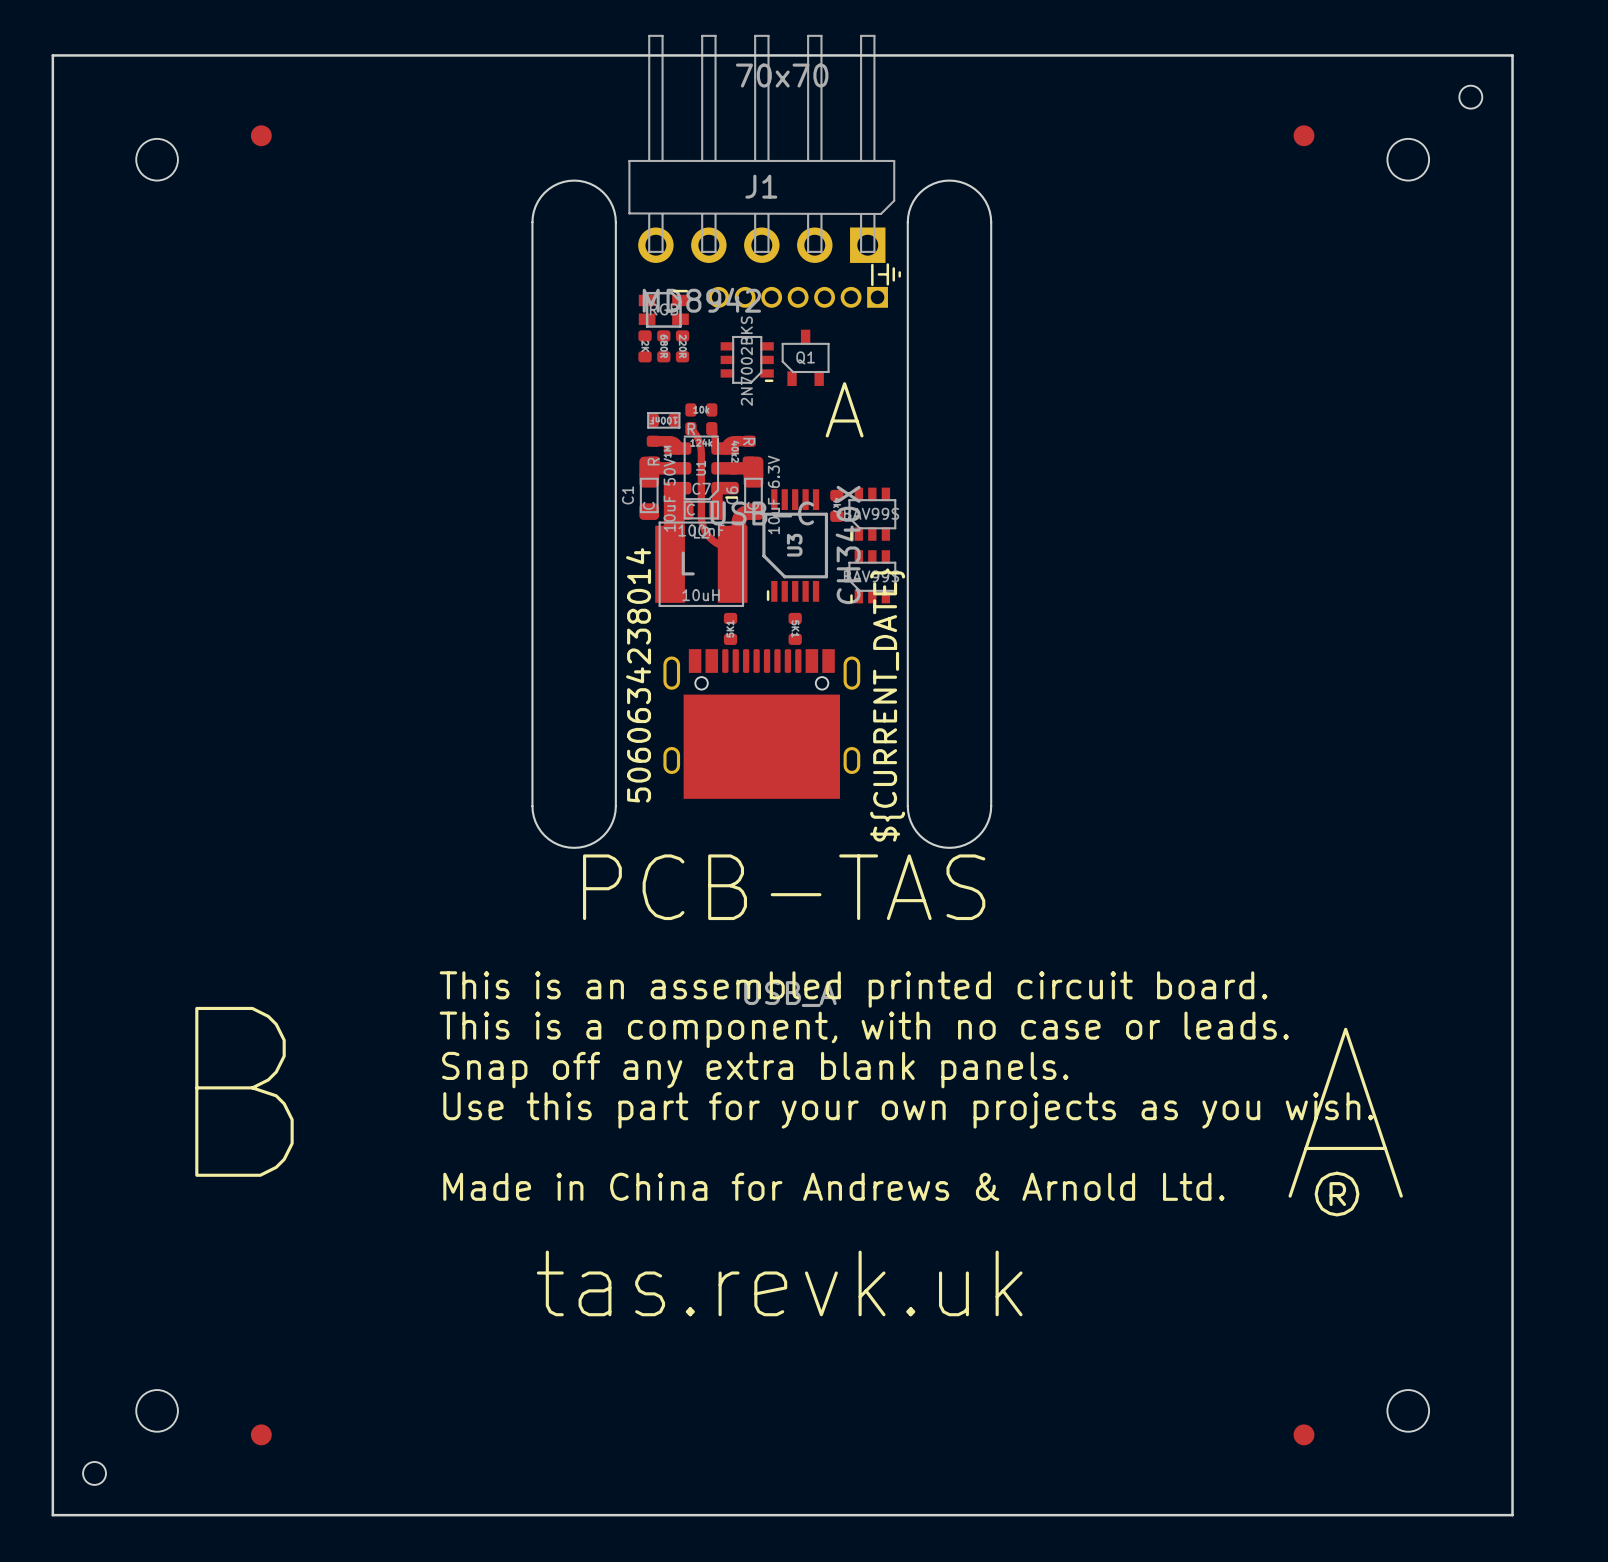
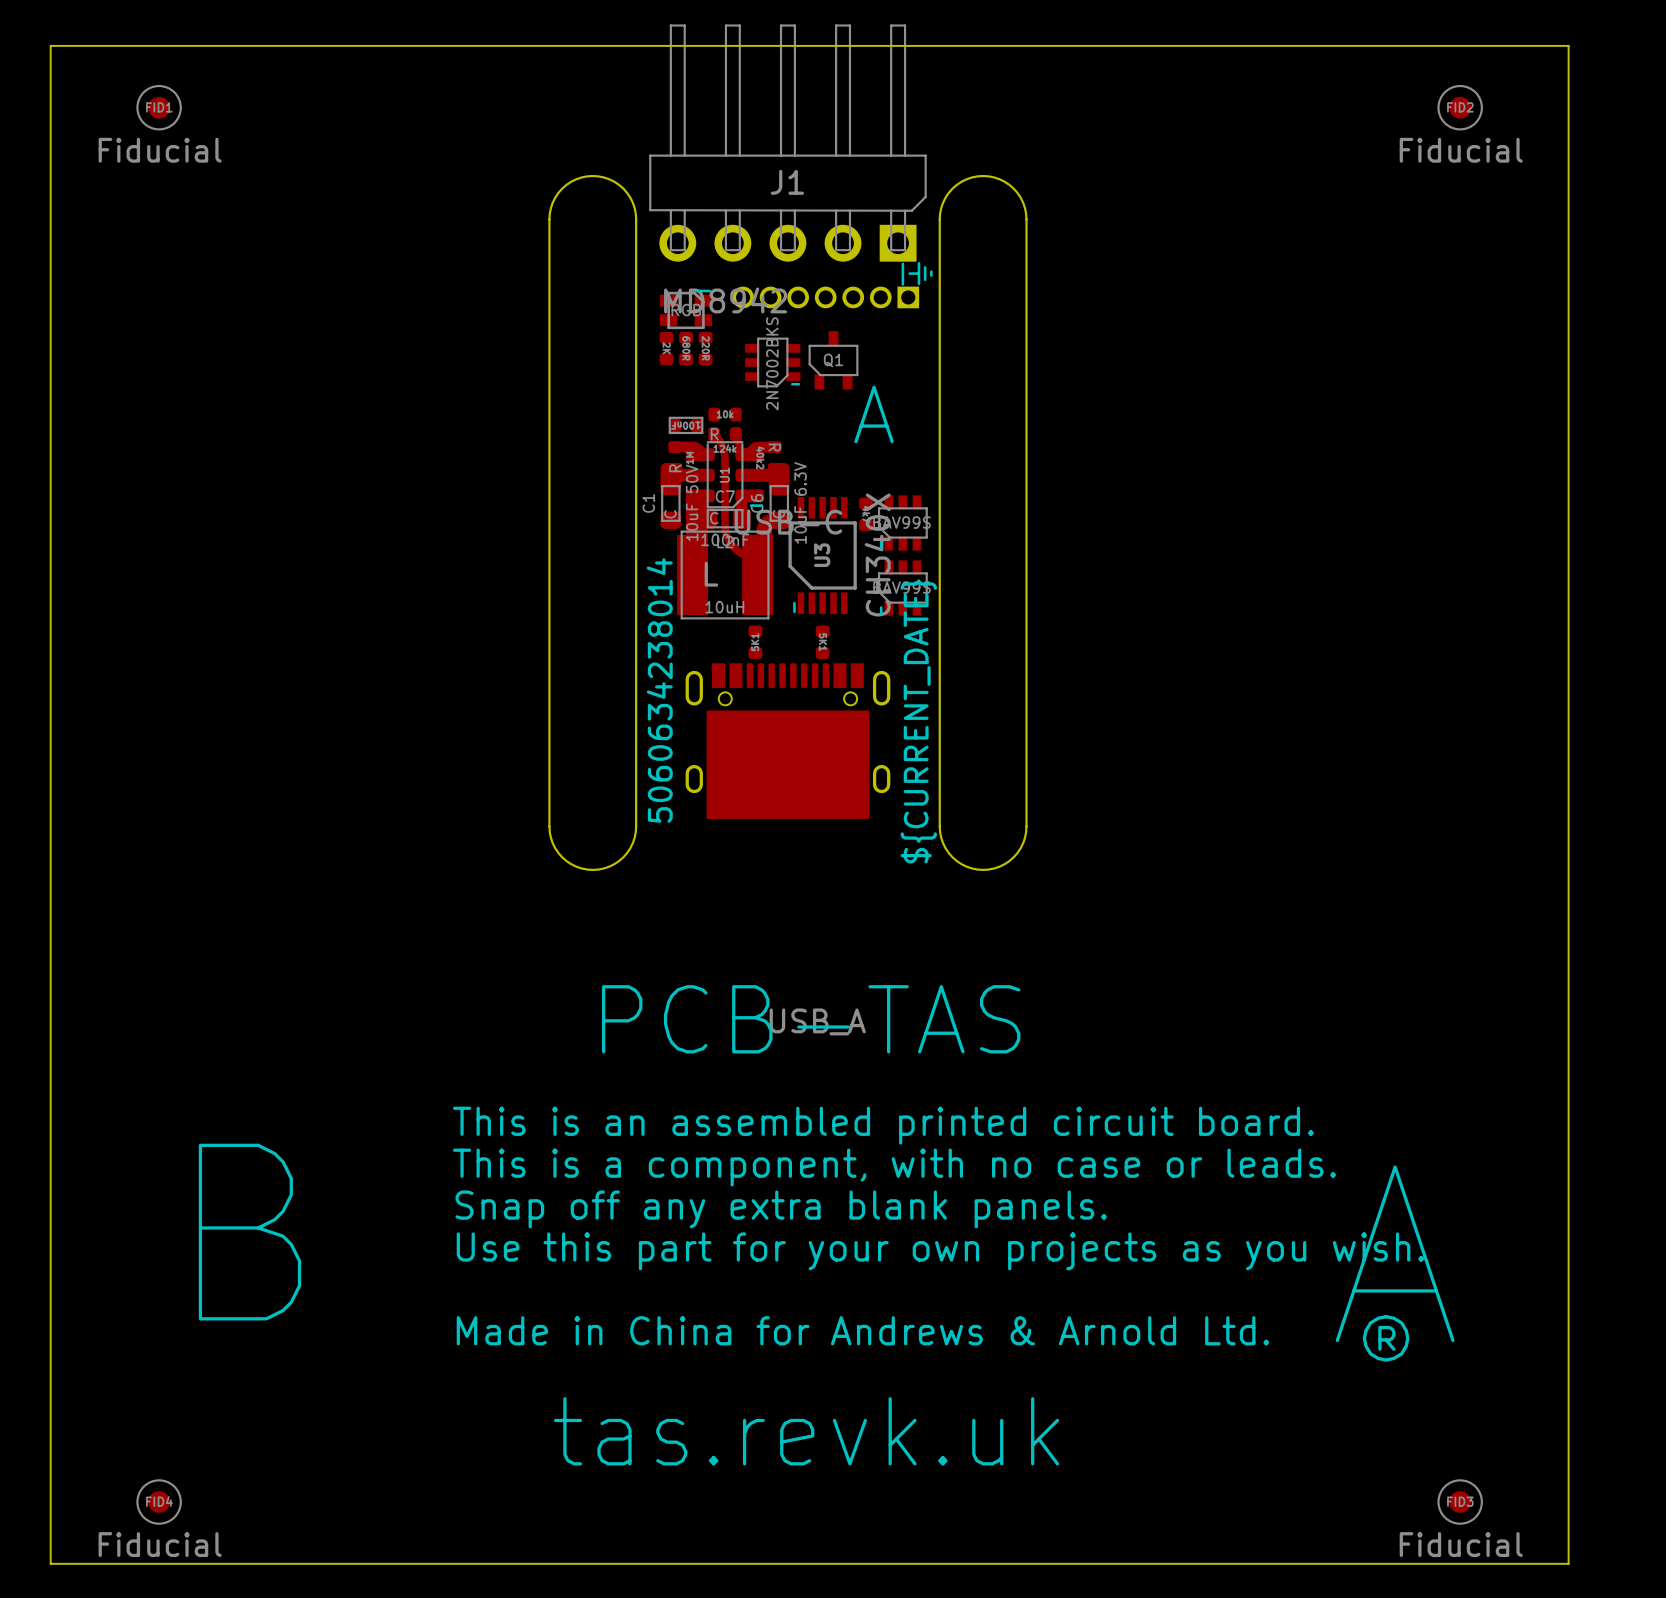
board edge: none -> (50, 45) (50, 1563) (1568, 1563) (1568, 45) (50, 45)
FID1: none -> Fiducial (159, 107)
FID2: none -> Fiducial (1460, 107)
part: 70x70 (782, 785) -> none
text position: PCB-TAS (784, 887) -> PCB-TAS (811, 1019)
text position: This is an assembled printed circuit board. (853, 989) -> This is an assembled printed circuit board. (883, 1125)
text position: This is a component, with no case or leads. (864, 1029) -> This is a component, with no case or leads. (894, 1167)
text position: Snap off any extra blank panels. (755, 1070) -> Snap off any extra blank panels. (781, 1209)
text position: B (244, 1091) -> B (249, 1232)
text position: Use this part for your own projects as you wish. (908, 1110) -> Use this part for your own projects as you wish. (940, 1251)
text position: A (1345, 1112) -> A (1395, 1253)
text position: Made in China for Andrews & Arnold Ltd. (833, 1186) -> Made in China for Andrews & Arnold Ltd. (862, 1330)
text position: ® (1337, 1194) -> ® (1386, 1338)
text position: tas.revk.uk (779, 1283) -> tas.revk.uk (806, 1431)
FID4: none -> Fiducial (159, 1502)
FID3: none -> Fiducial (1460, 1502)

